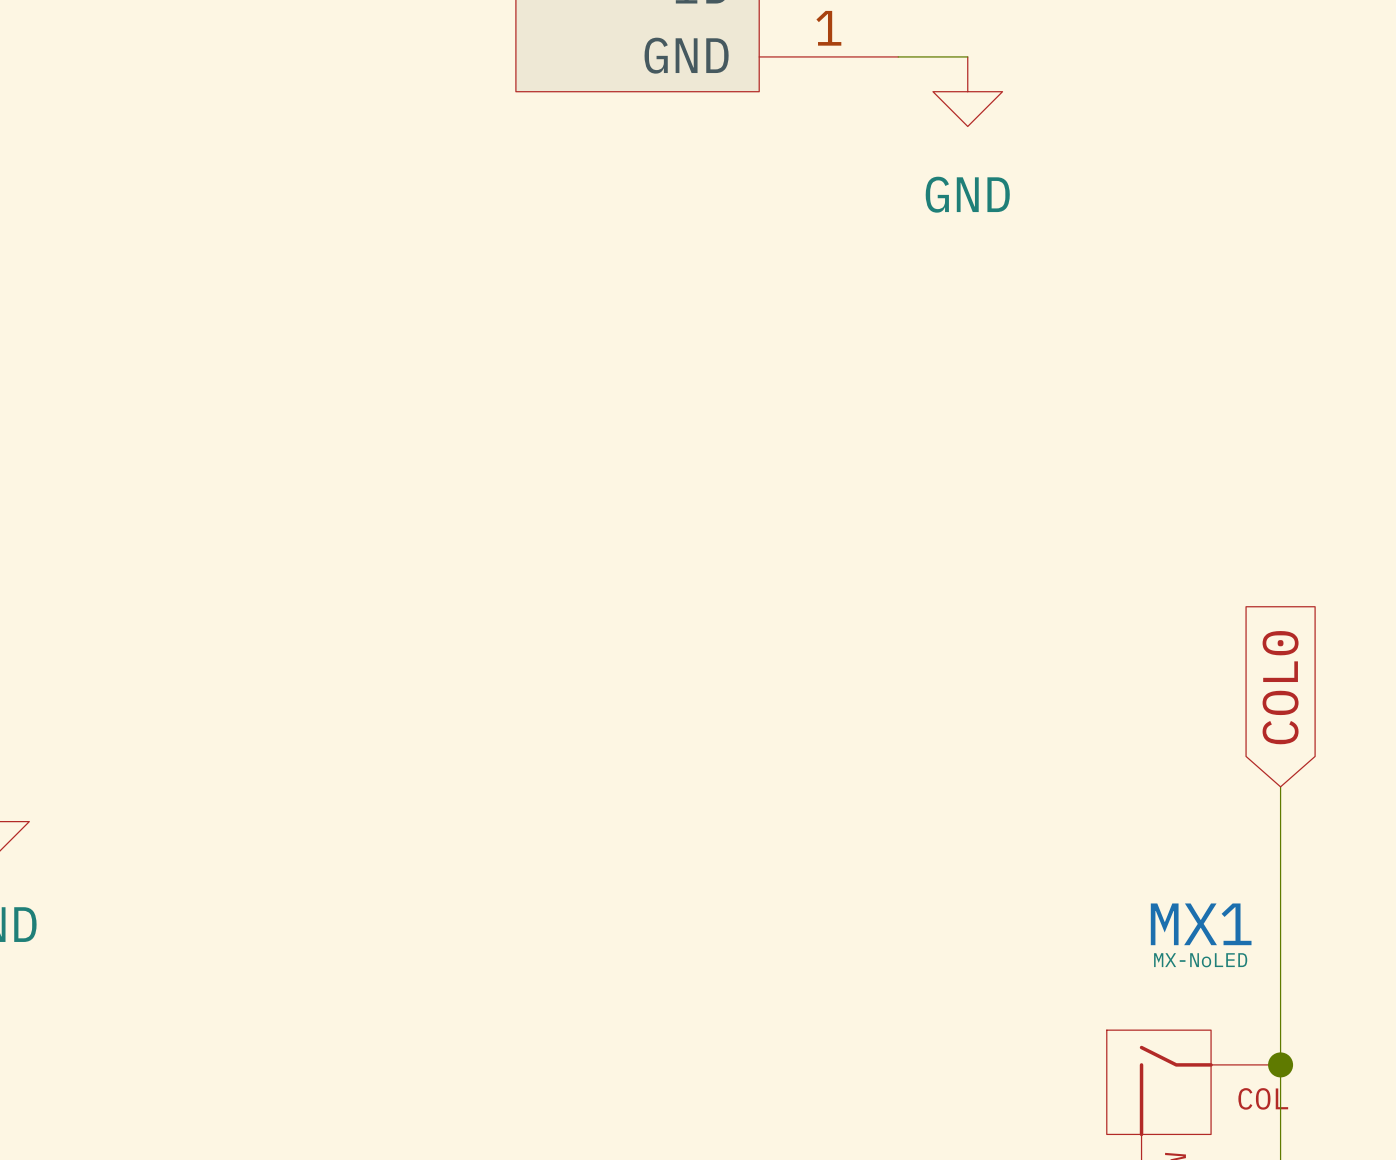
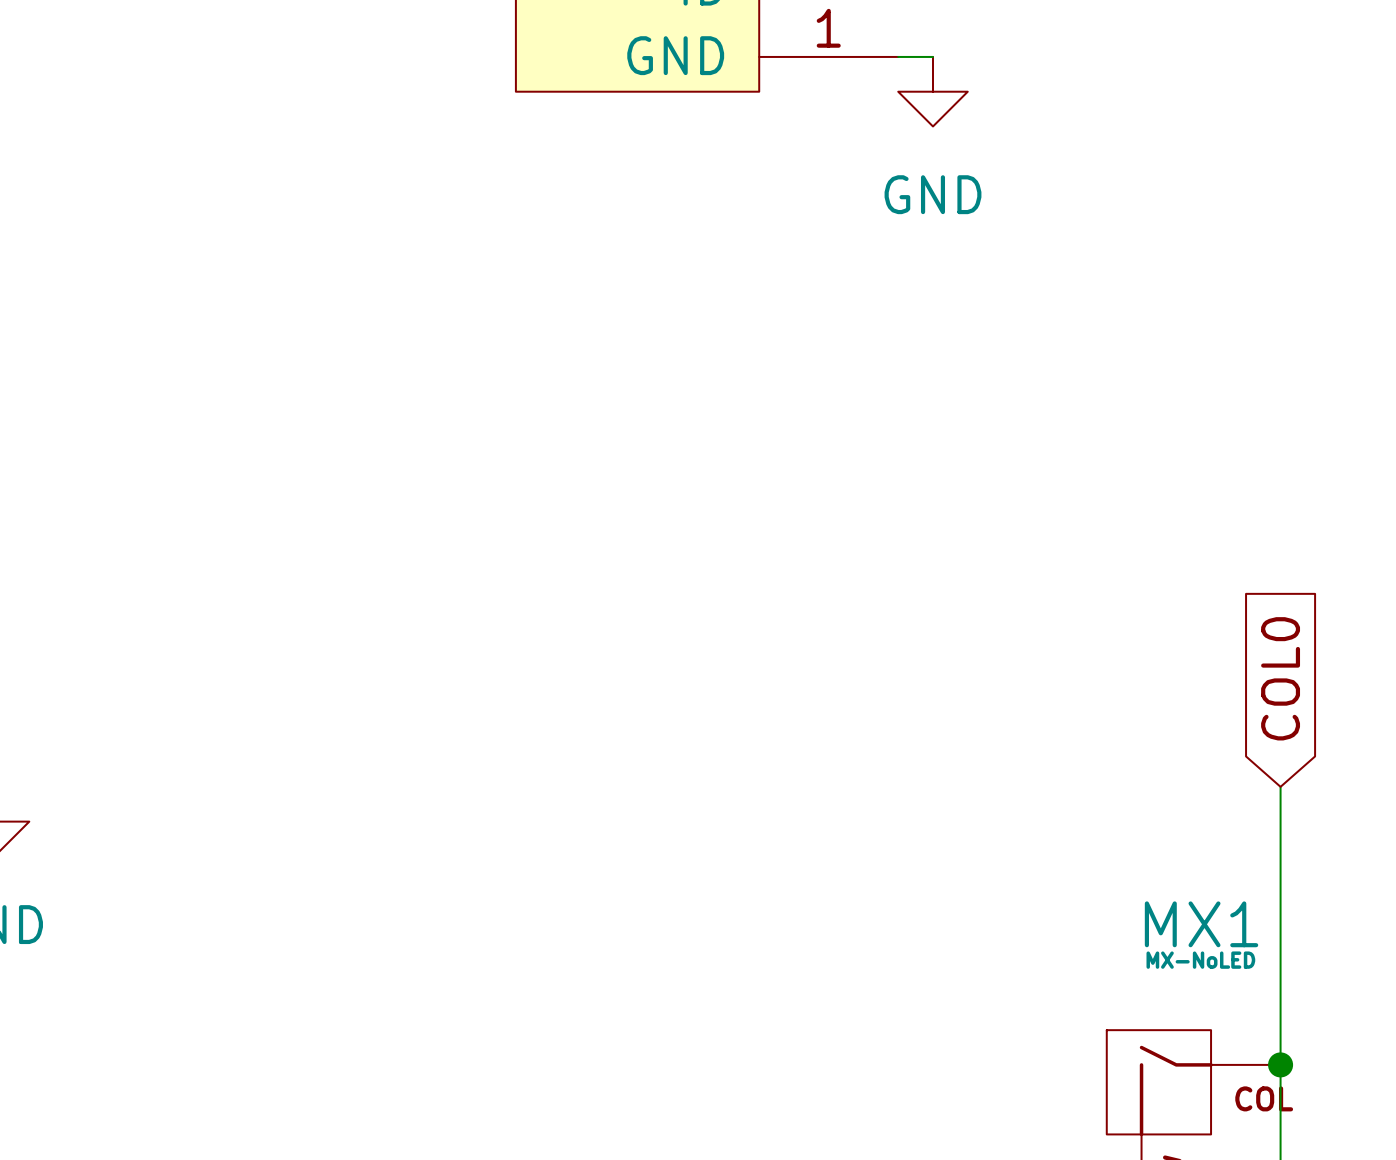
wire: (932, 56) (967, 56) -> none
power symbol position: GND (967, 91) -> GND (932, 91)

